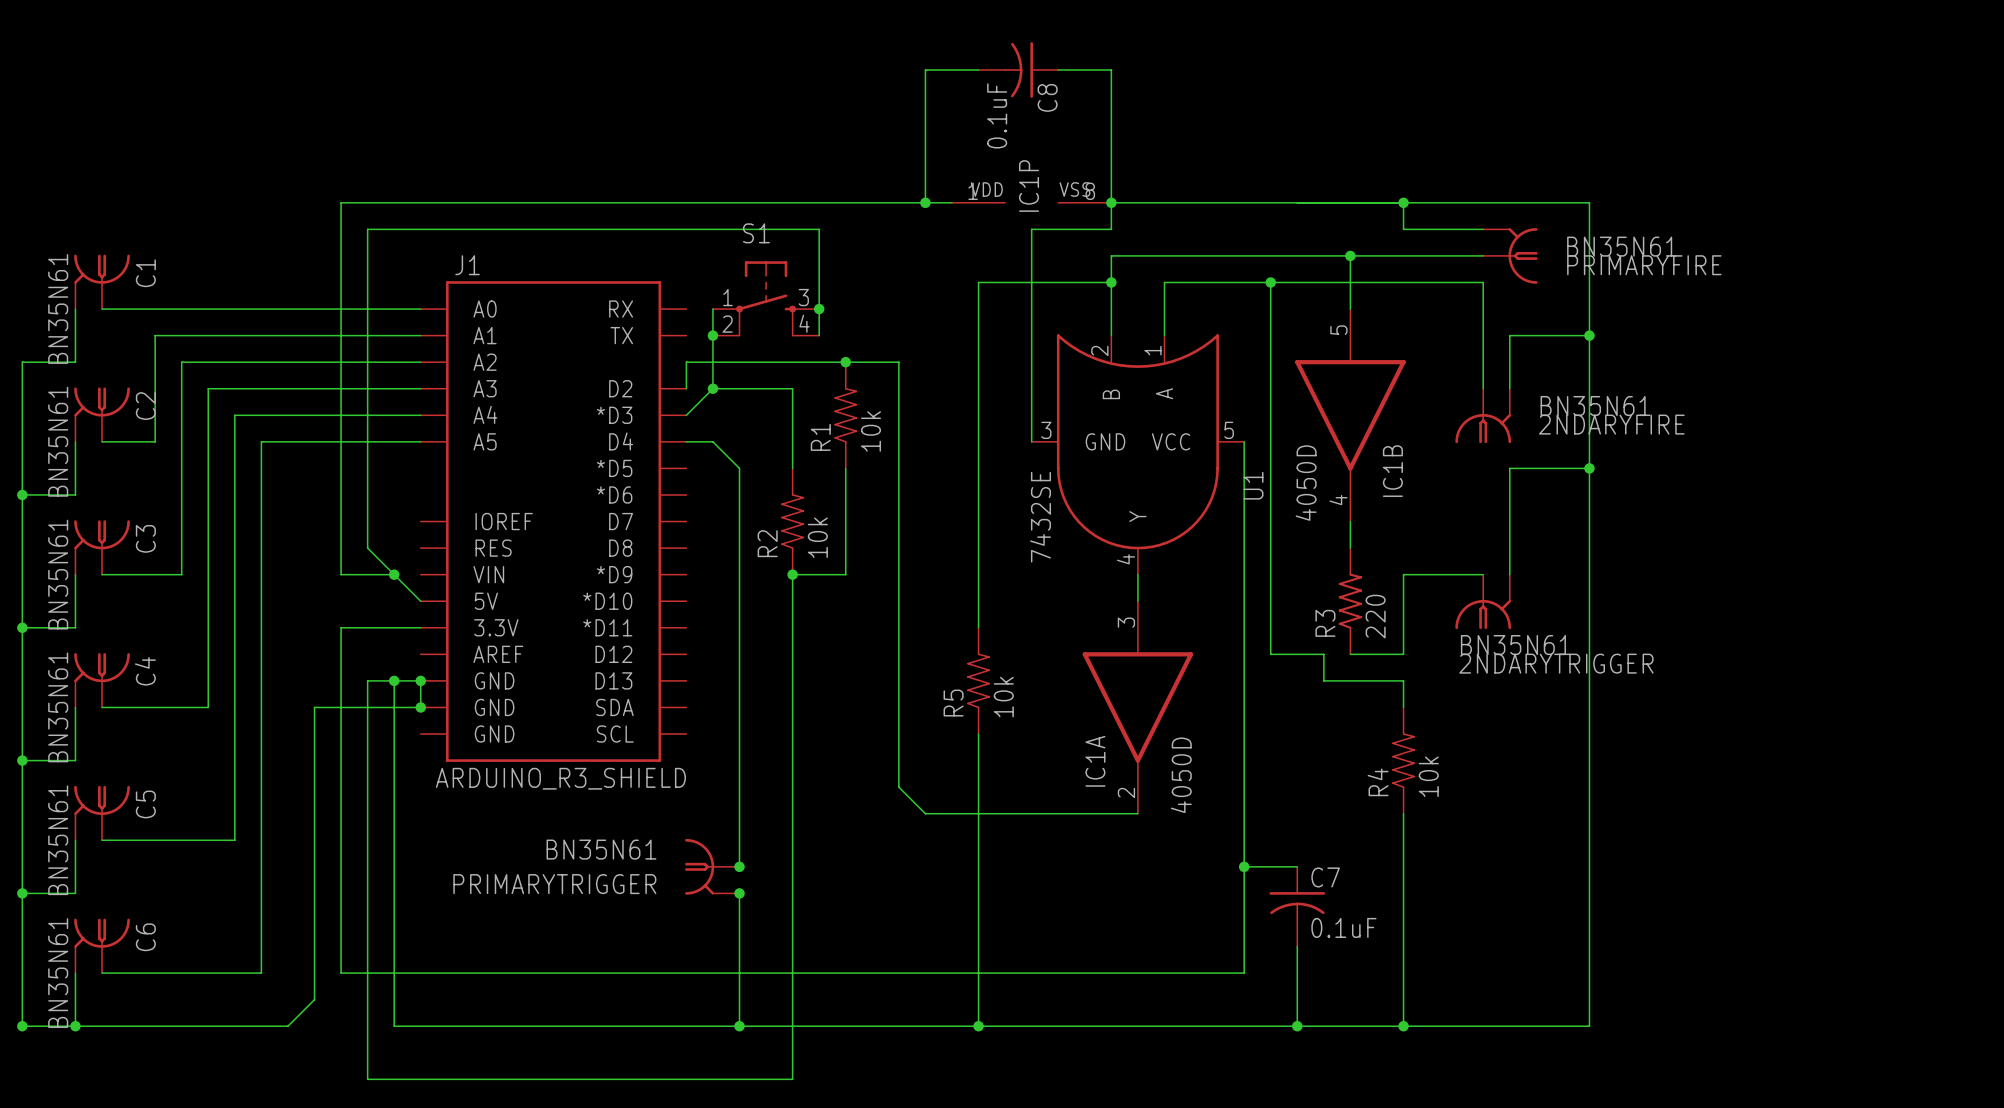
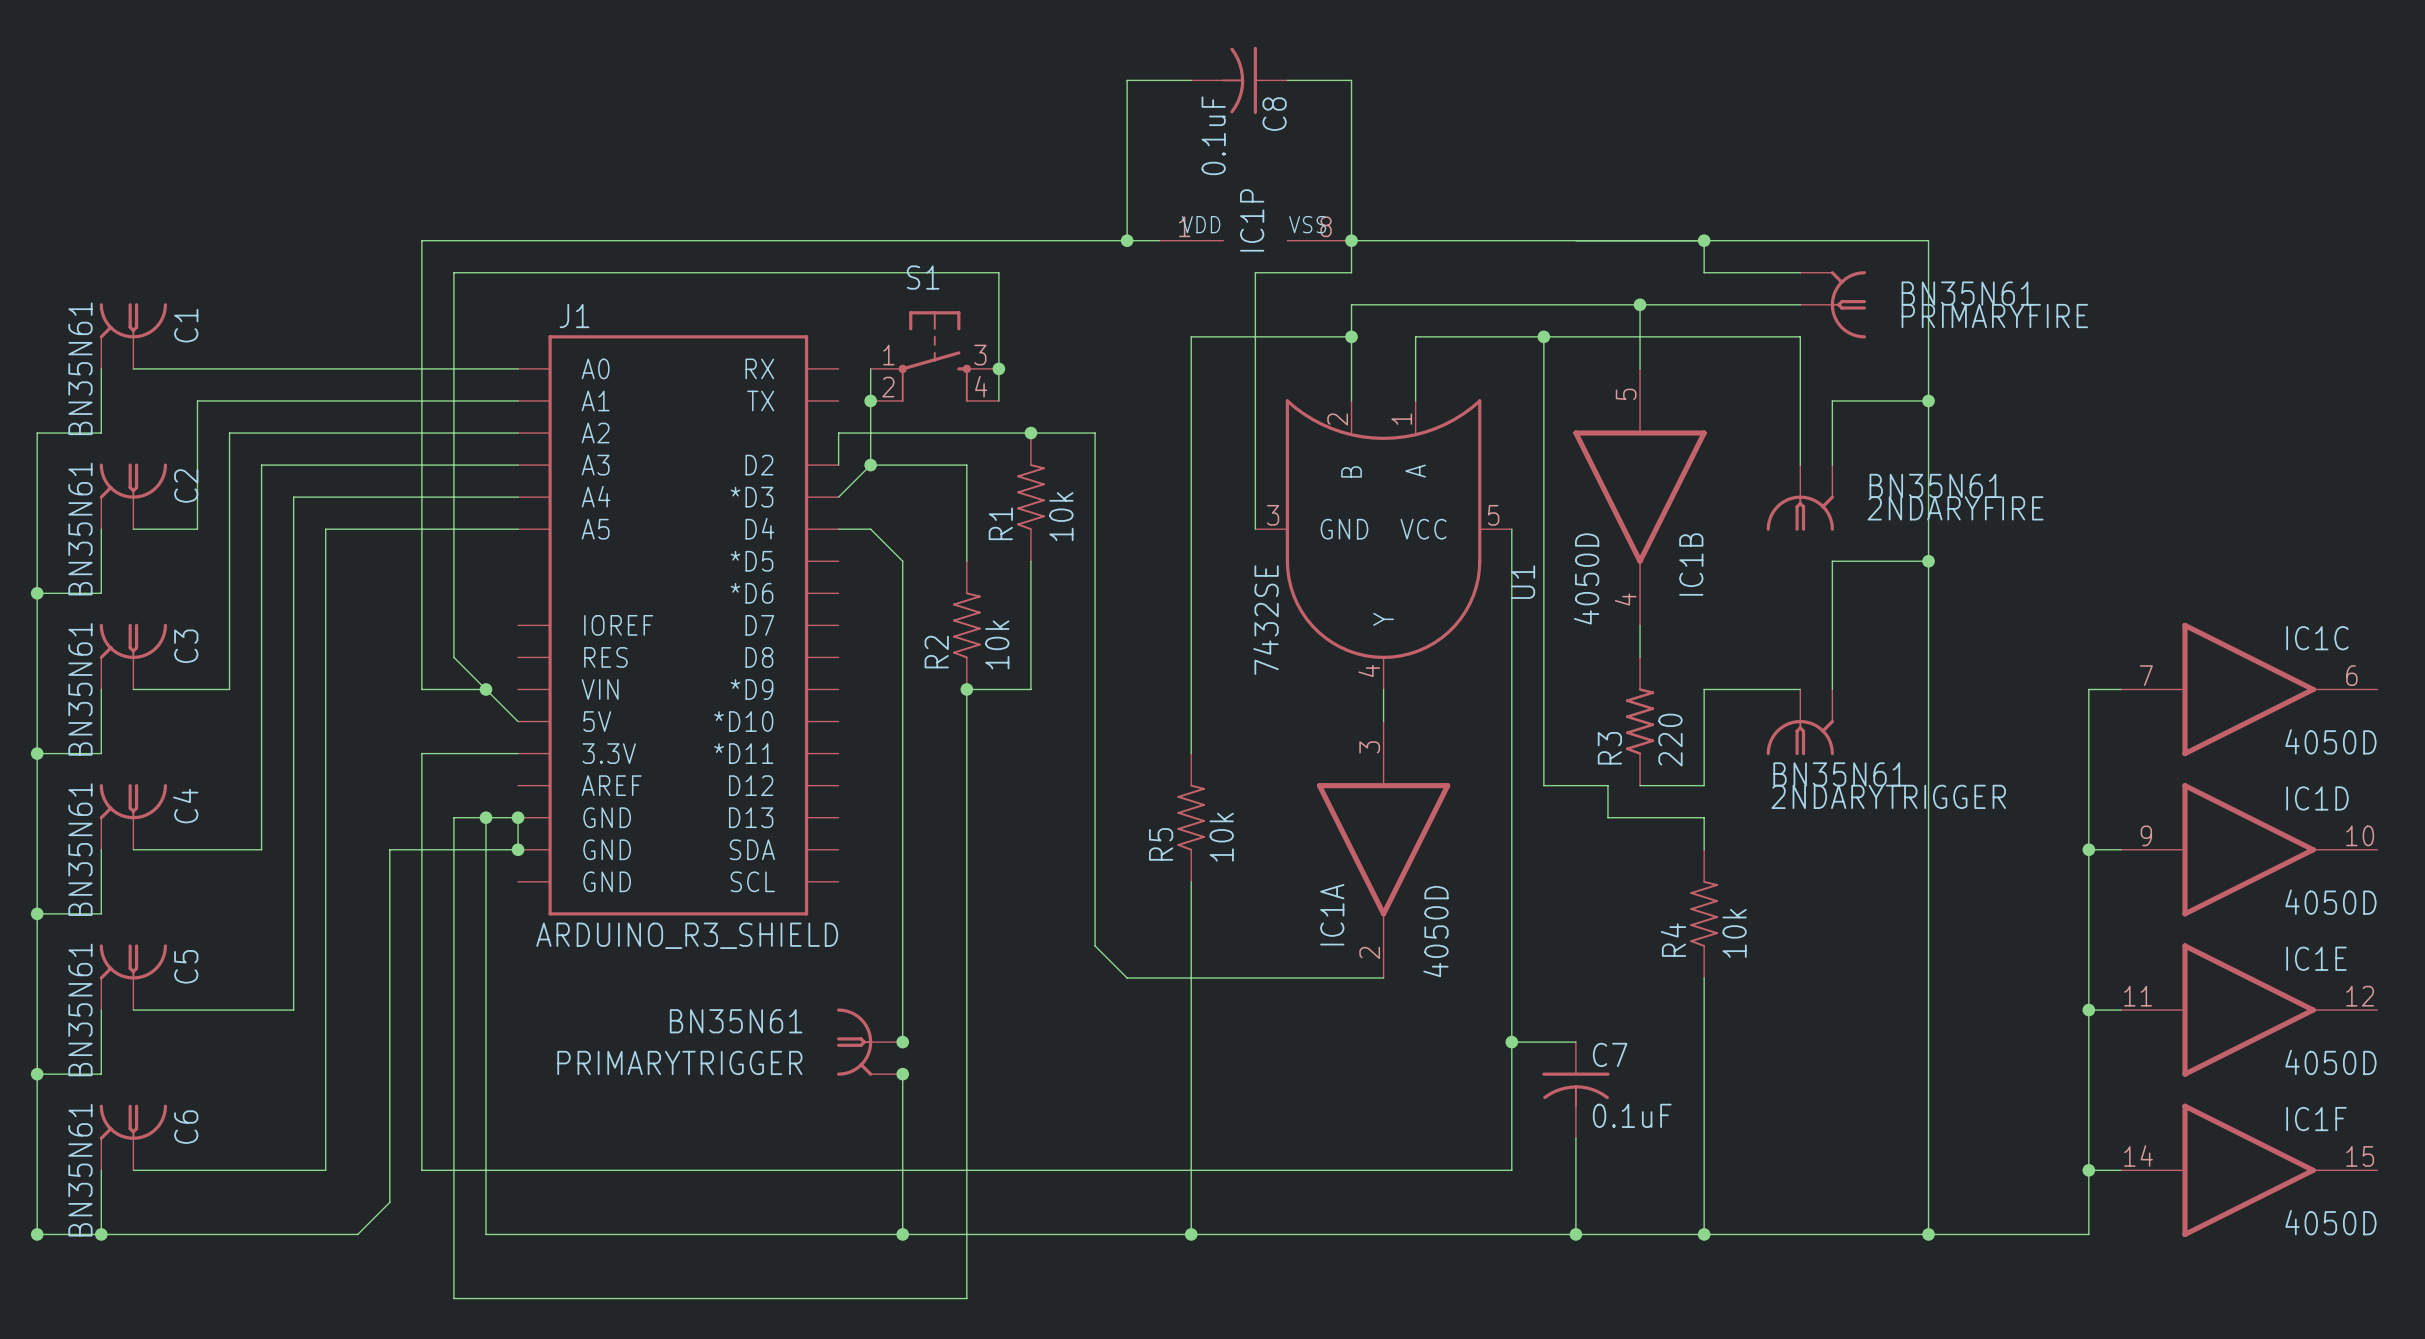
wire: none -> (2120, 689) (2088, 689) (2088, 1234) (1928, 1234)
IC1C: none -> 4050D (2249, 689)
wire: none -> (2088, 849) (2120, 849)
junction: none -> (2088, 849)
IC1D: none -> 4050D (2249, 849)
wire: none -> (2088, 1010) (2120, 1010)
junction: none -> (2088, 1010)
IC1E: none -> 4050D (2249, 1010)
wire: none -> (2088, 1170) (2120, 1170)
junction: none -> (2088, 1170)
IC1F: none -> 4050D (2249, 1170)
junction: none -> (1928, 1234)

